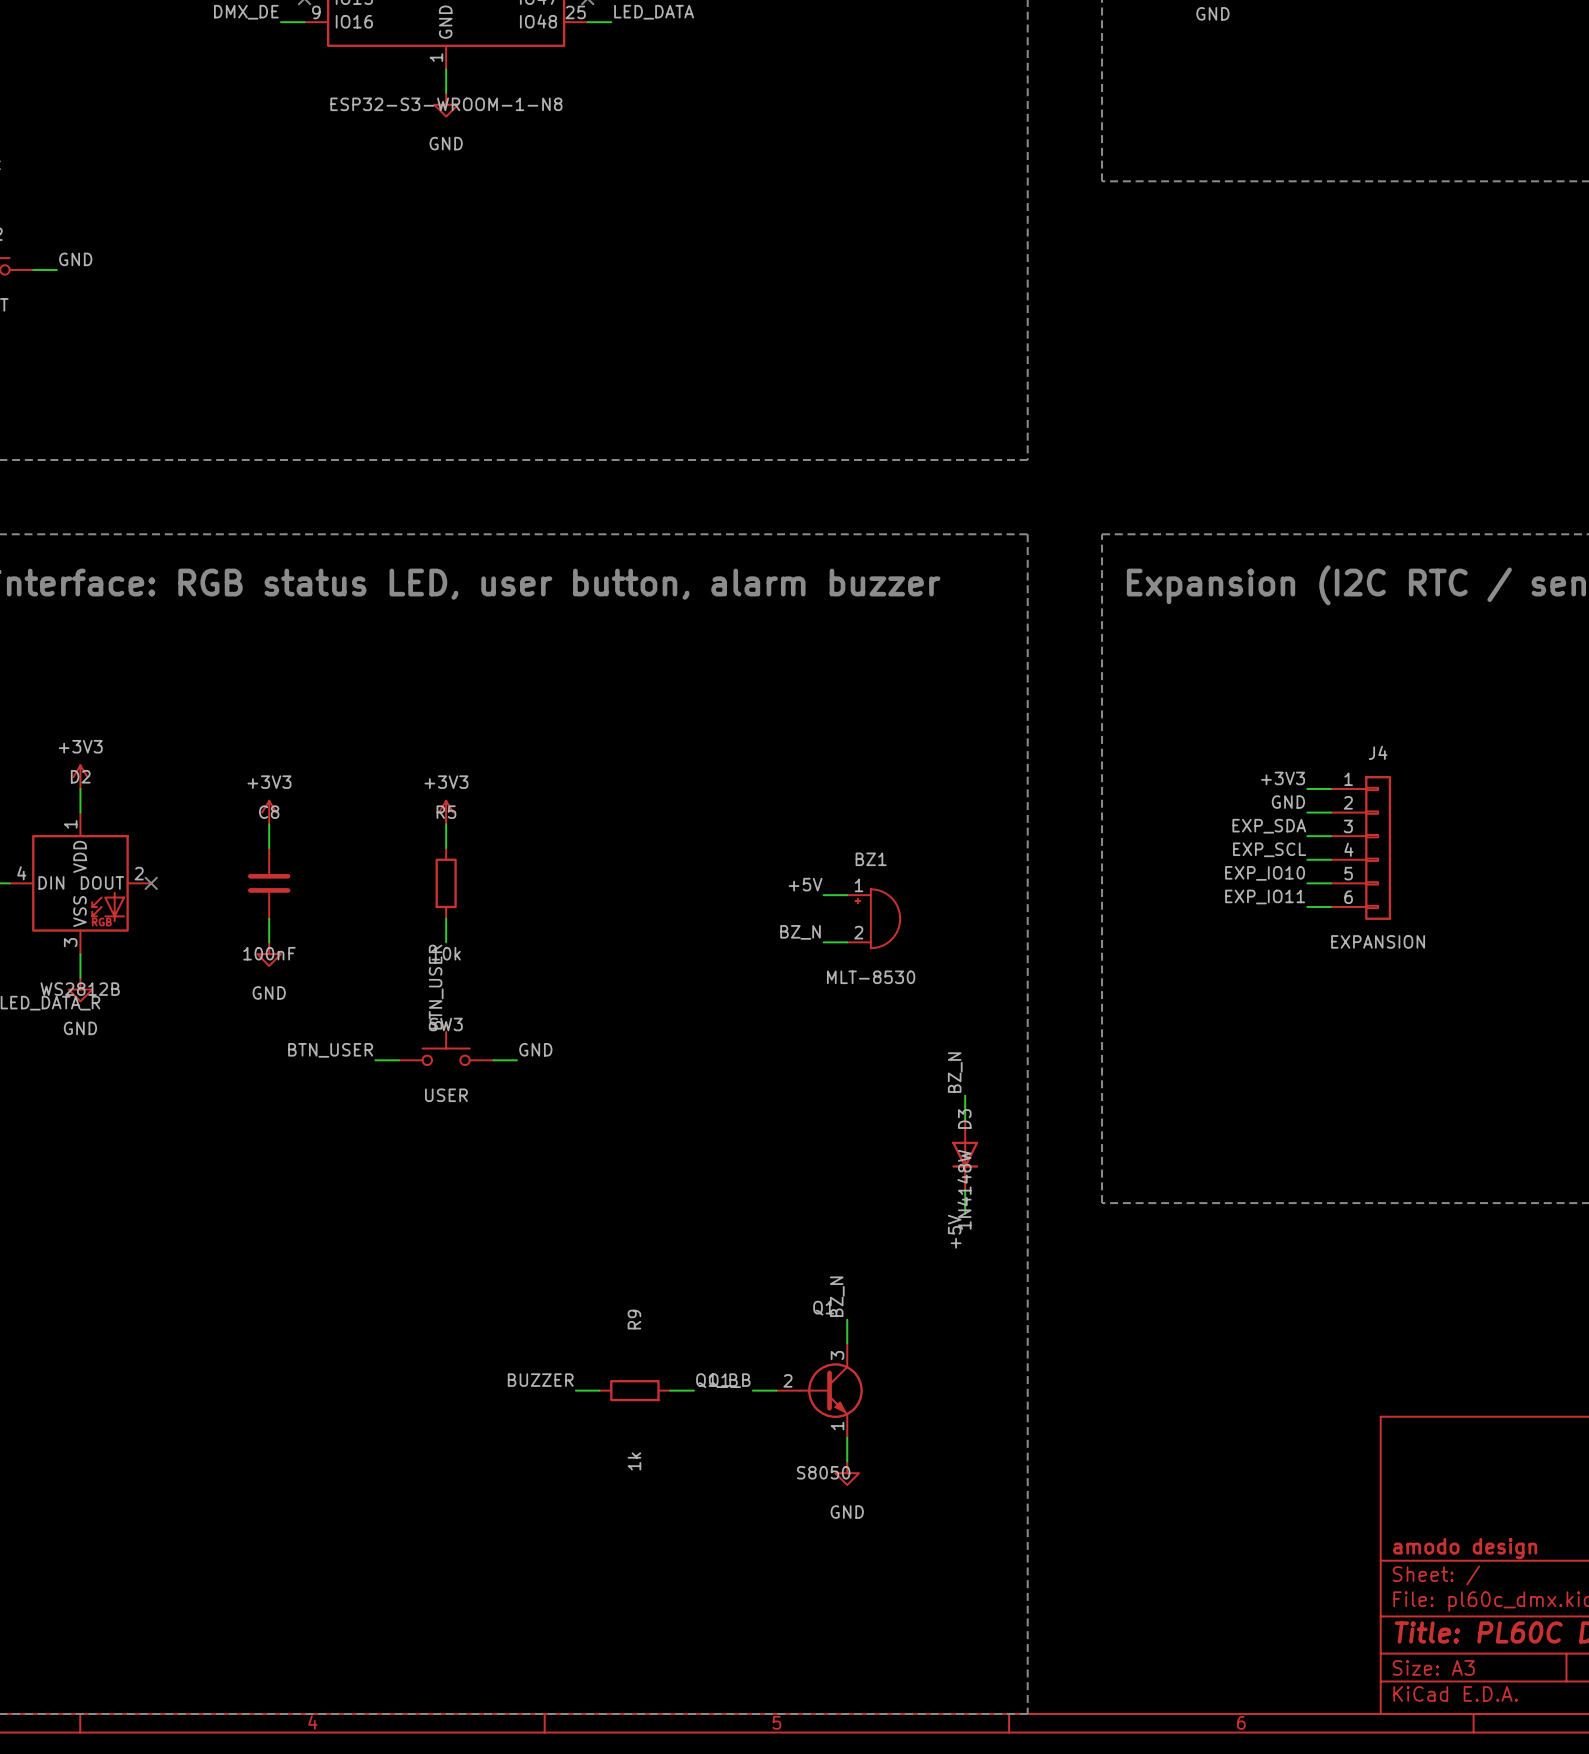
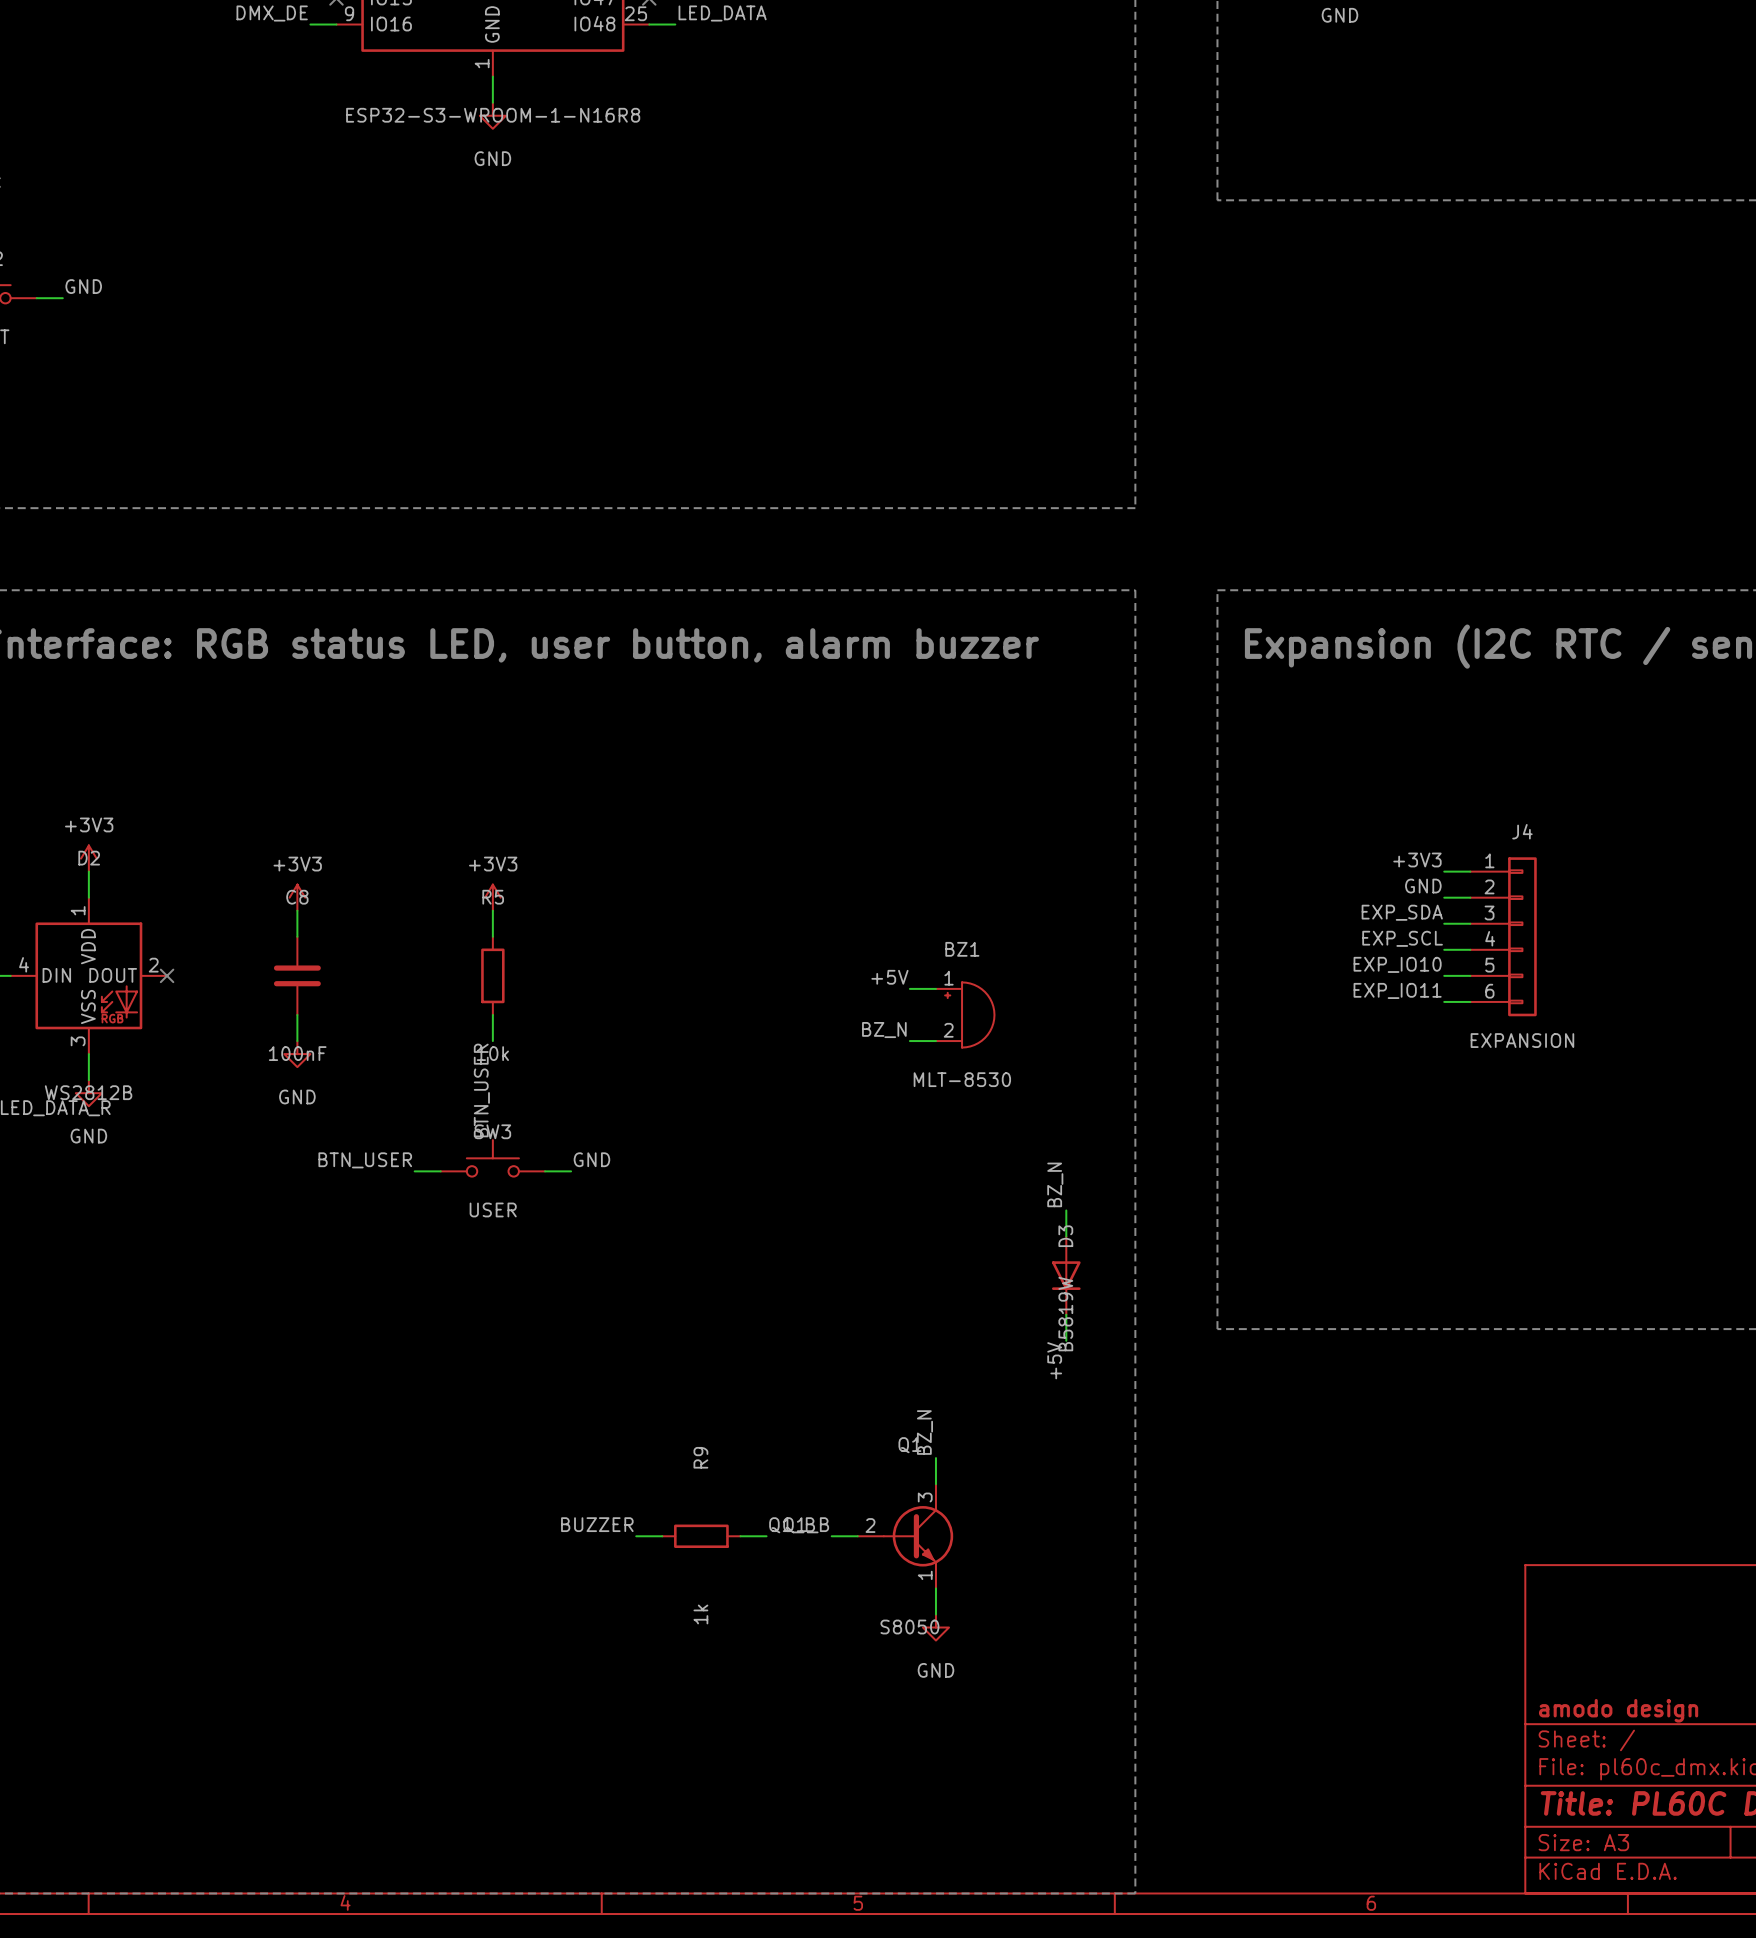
part value: ESP32-S3-WROOM-1-N8 (446, 104) -> ESP32-S3-WROOM-1-N16R8 (493, 115)
D3 value: 1N4148W (964, 1189) -> B5819W (1065, 1314)

